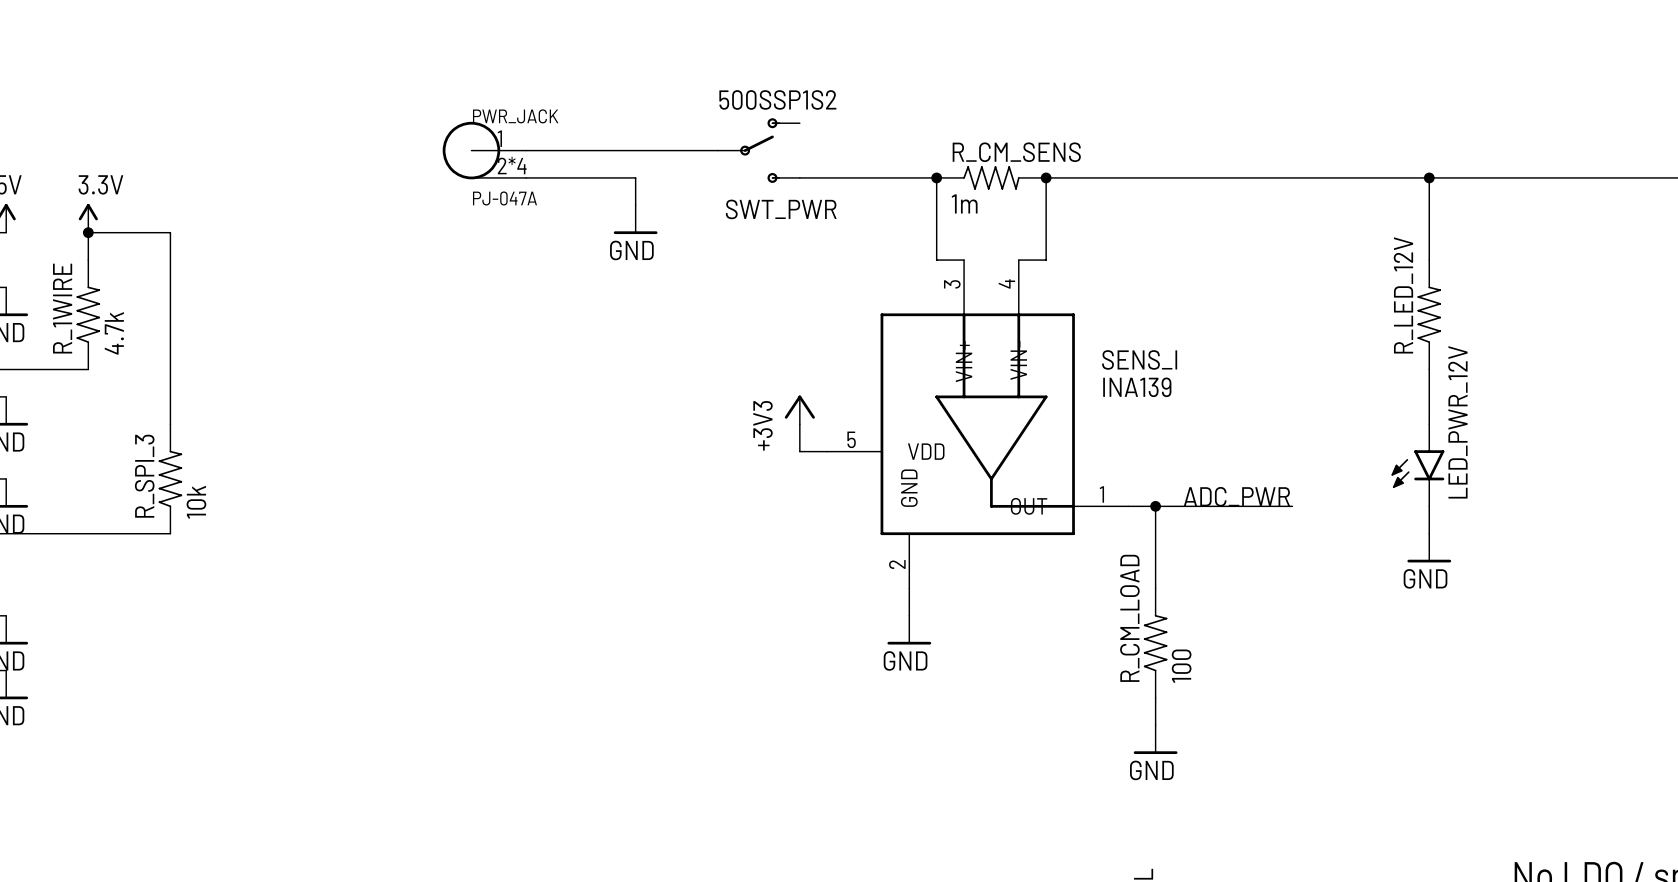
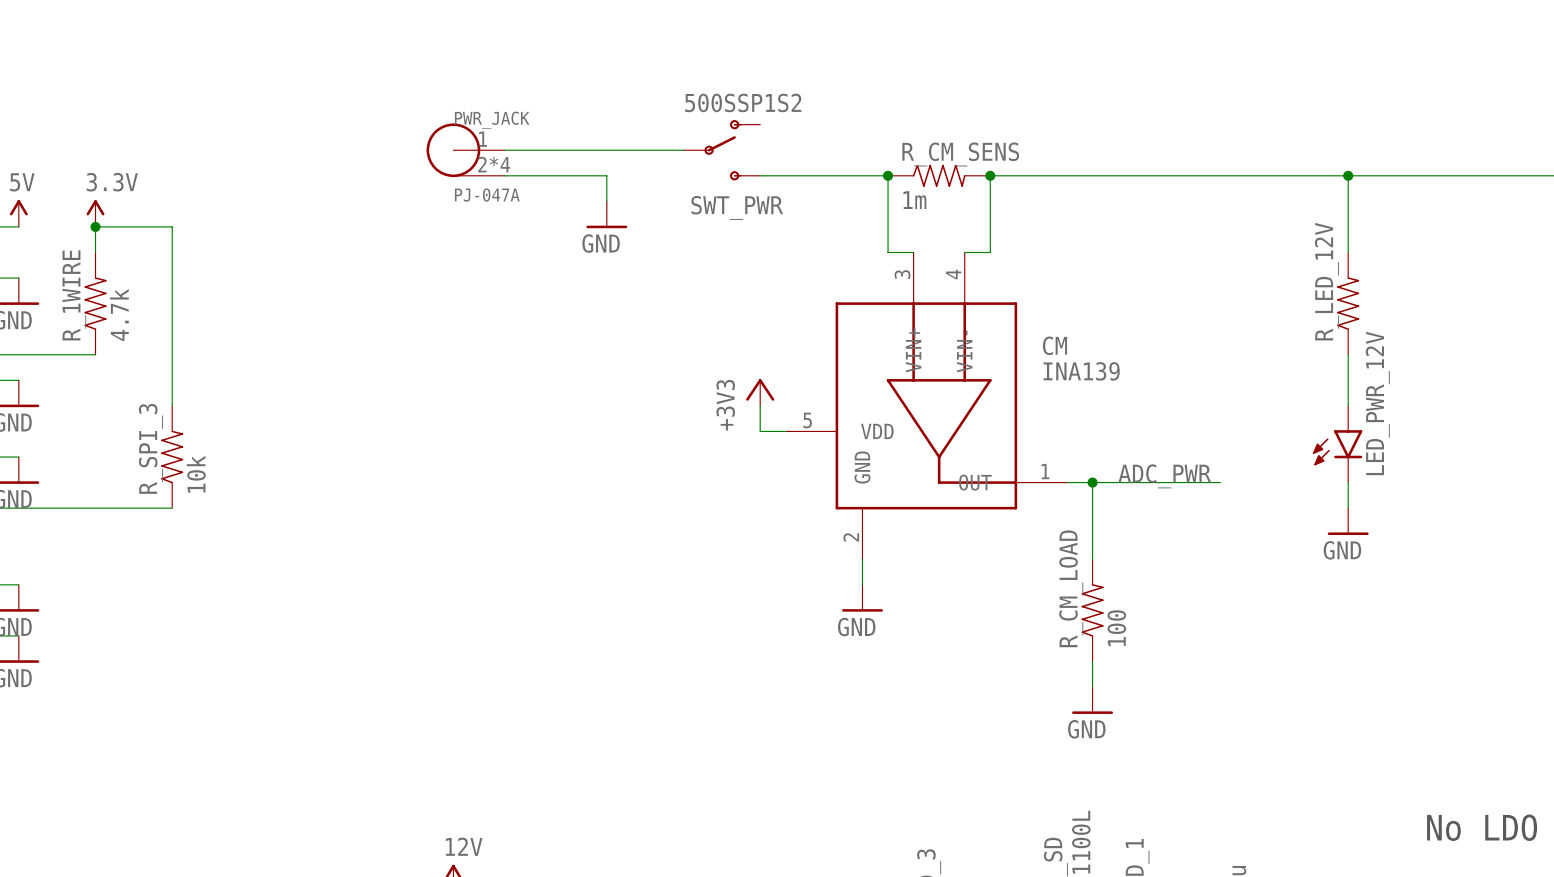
SENS_I name: SENS_I (1139, 359) -> CM (1054, 345)

